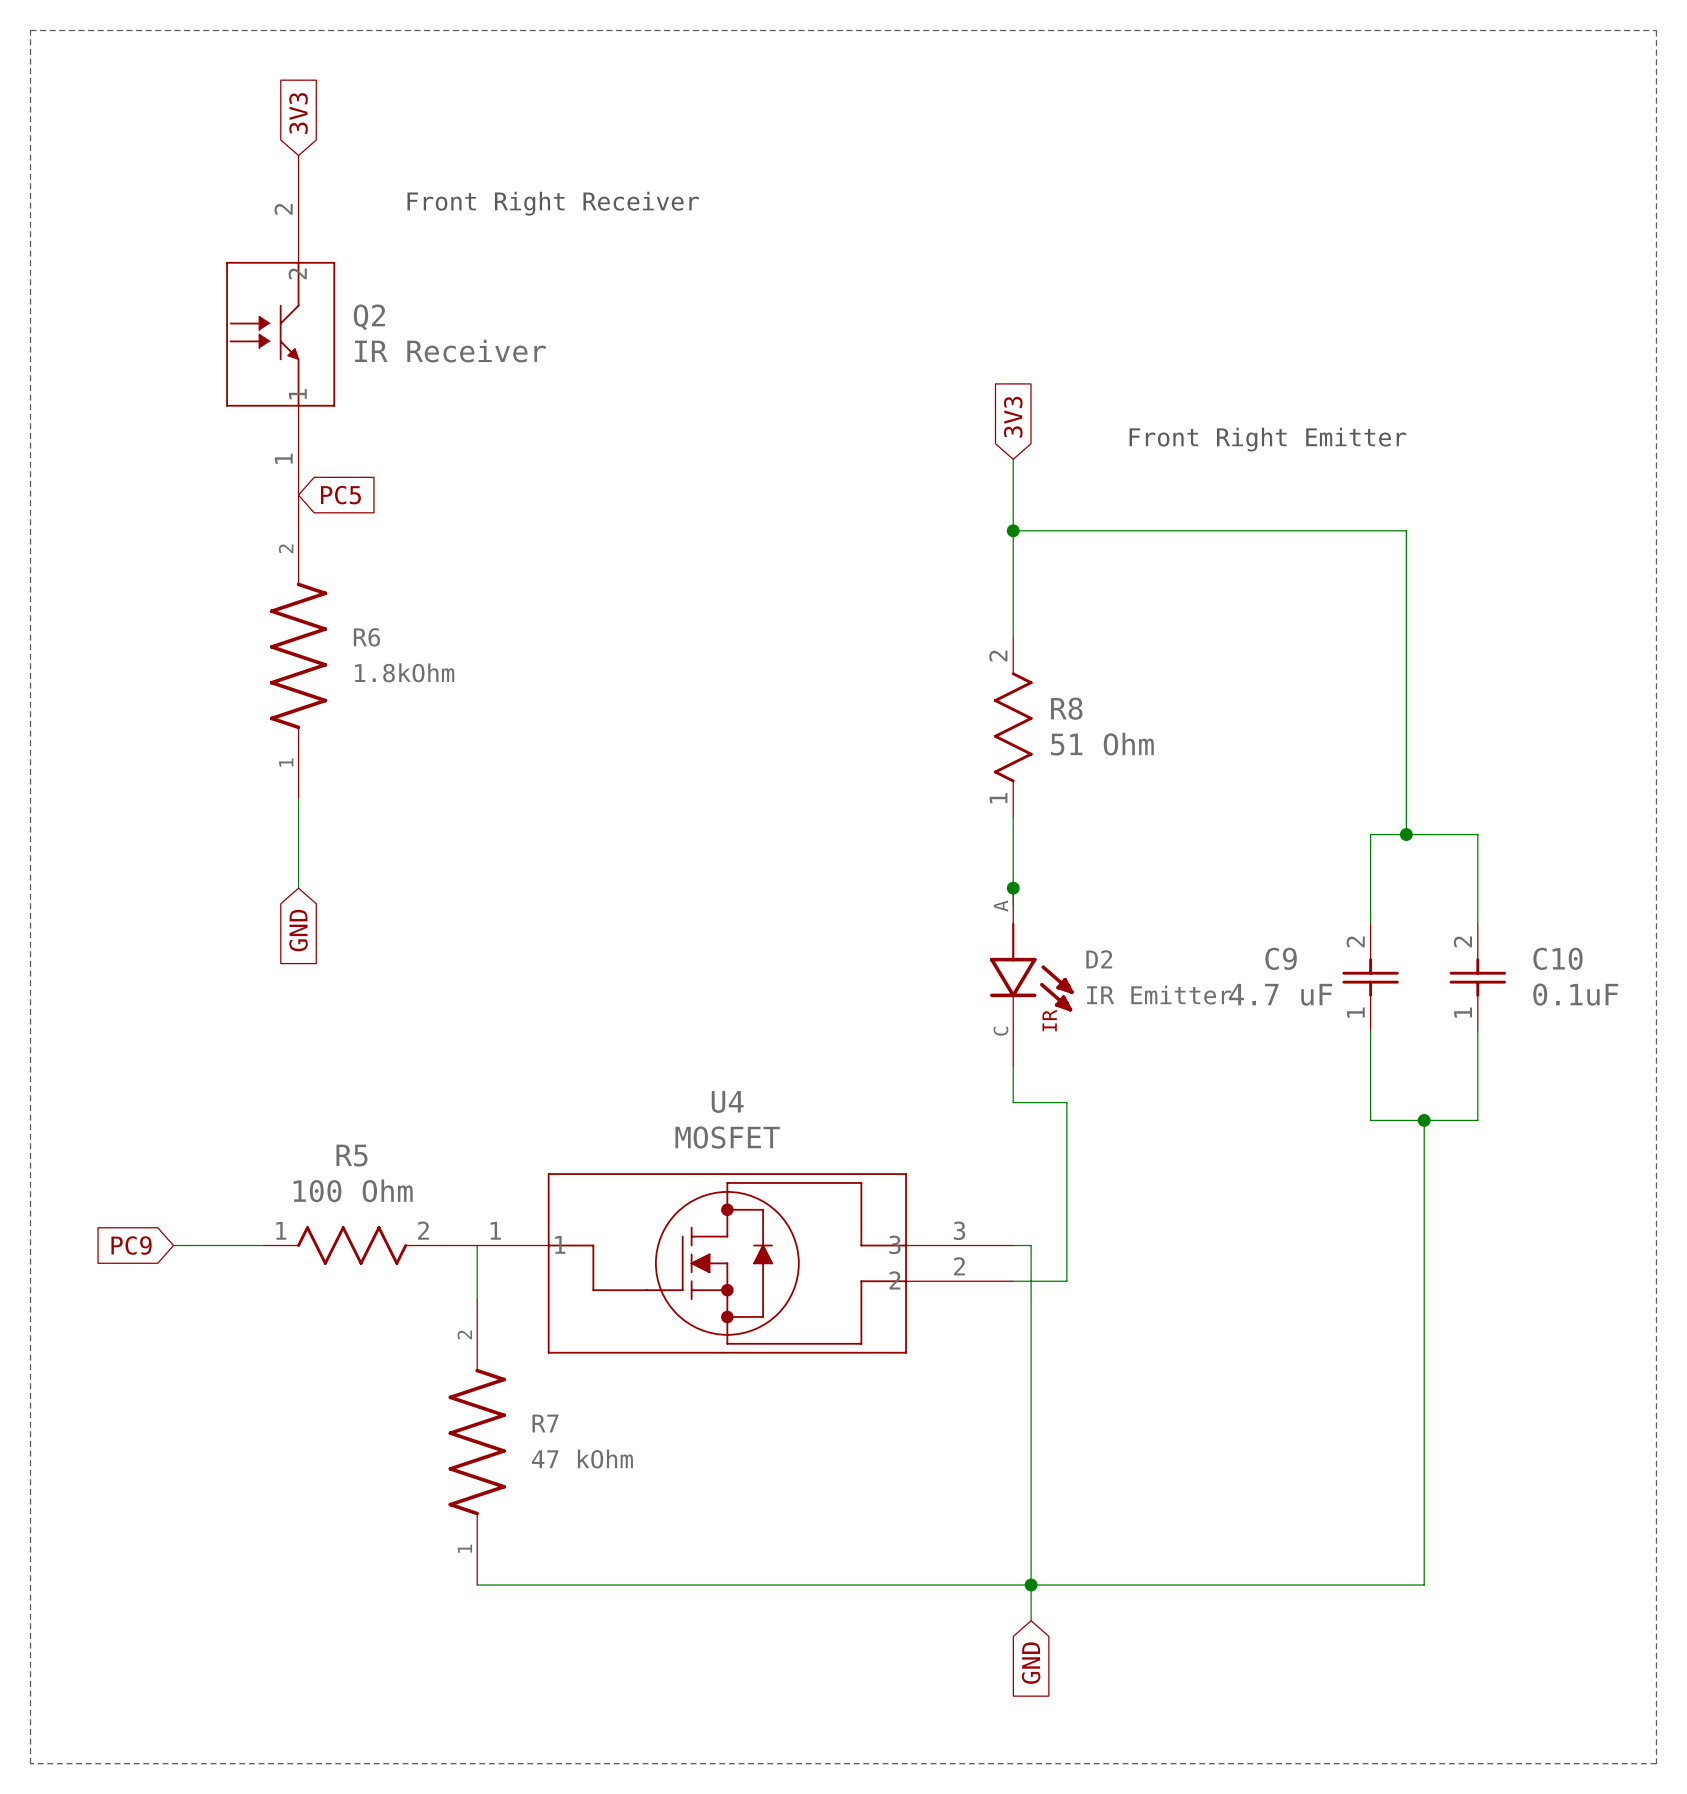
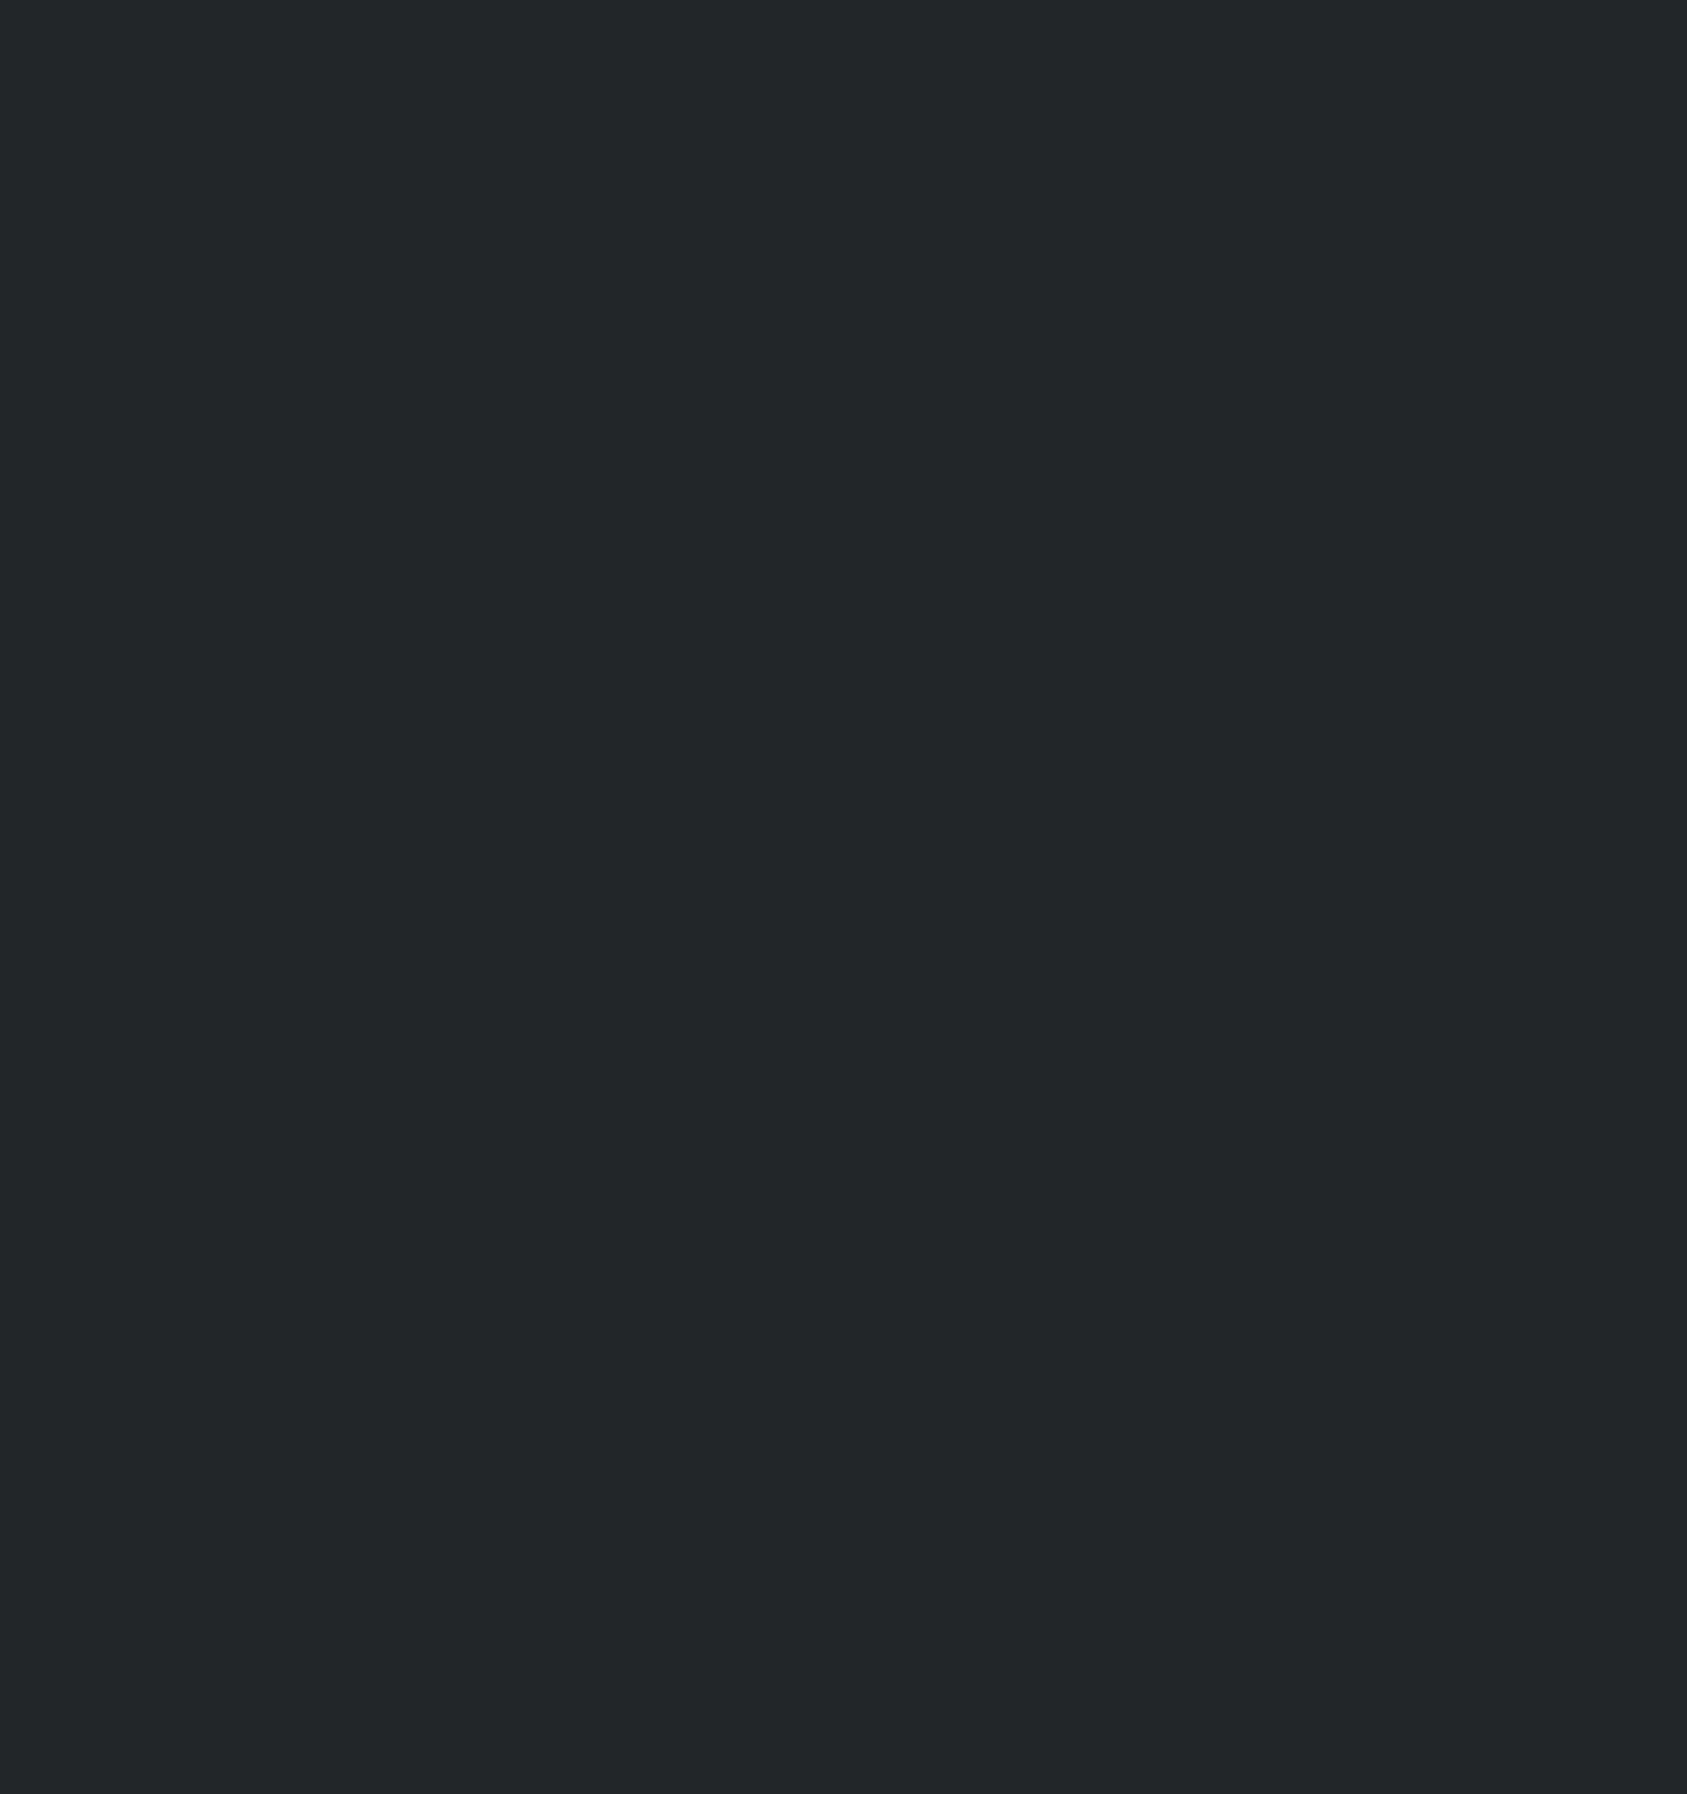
line: (30, 30) (1656, 30) (1656, 1763) (30, 1763) (30, 30) -> none
global label: 3V3 (298, 113) -> none
text: Front Right Receiver (553, 203) -> none
Q2: IR Receiver (280, 334) -> none
global label: 3V3 (1013, 417) -> none
text: Front Right Emitter (1267, 439) -> none
wire: (1013, 459) (1013, 638) -> none
global label: PC5 (340, 495) -> none
wire: (1013, 530) (1406, 530) (1406, 834) -> none
junction: (1013, 530) -> none
R6: 1.8kOhm (298, 655) -> none
R8: 51 Ohm (1013, 727) -> none
wire: (298, 798) (298, 888) -> none
wire: (1013, 816) (1013, 906) -> none
junction: (1406, 834) -> none
junction: (1013, 888) -> none
wire: (1370, 923) (1370, 834) (1477, 834) (1477, 923) -> none
global label: GND (298, 930) -> none
D2: IR Emitter (1031, 977) -> none
C9: 4.7 uF (1370, 977) -> none
C10: 0.1uF (1477, 977) -> none
wire: (1370, 1031) (1370, 1120) (1477, 1120) (1477, 1031) -> none
wire: (1013, 1066) (1013, 1102) (1066, 1102) (1066, 1281) (1013, 1281) -> none
wire: (1424, 1120) (1424, 1585) (477, 1585) -> none
junction: (1424, 1120) -> none
global label: PC9 (131, 1245) -> none
wire: (173, 1245) (262, 1245) -> none
R5: 100 Ohm (352, 1245) -> none
wire: (477, 1245) (477, 1299) -> none
wire: (1013, 1245) (1031, 1245) (1031, 1620) -> none
U4: MOSFET (727, 1263) -> none
R7: 47 kOhm (477, 1442) -> none
junction: (1031, 1585) -> none
global label: GND (1031, 1663) -> none

